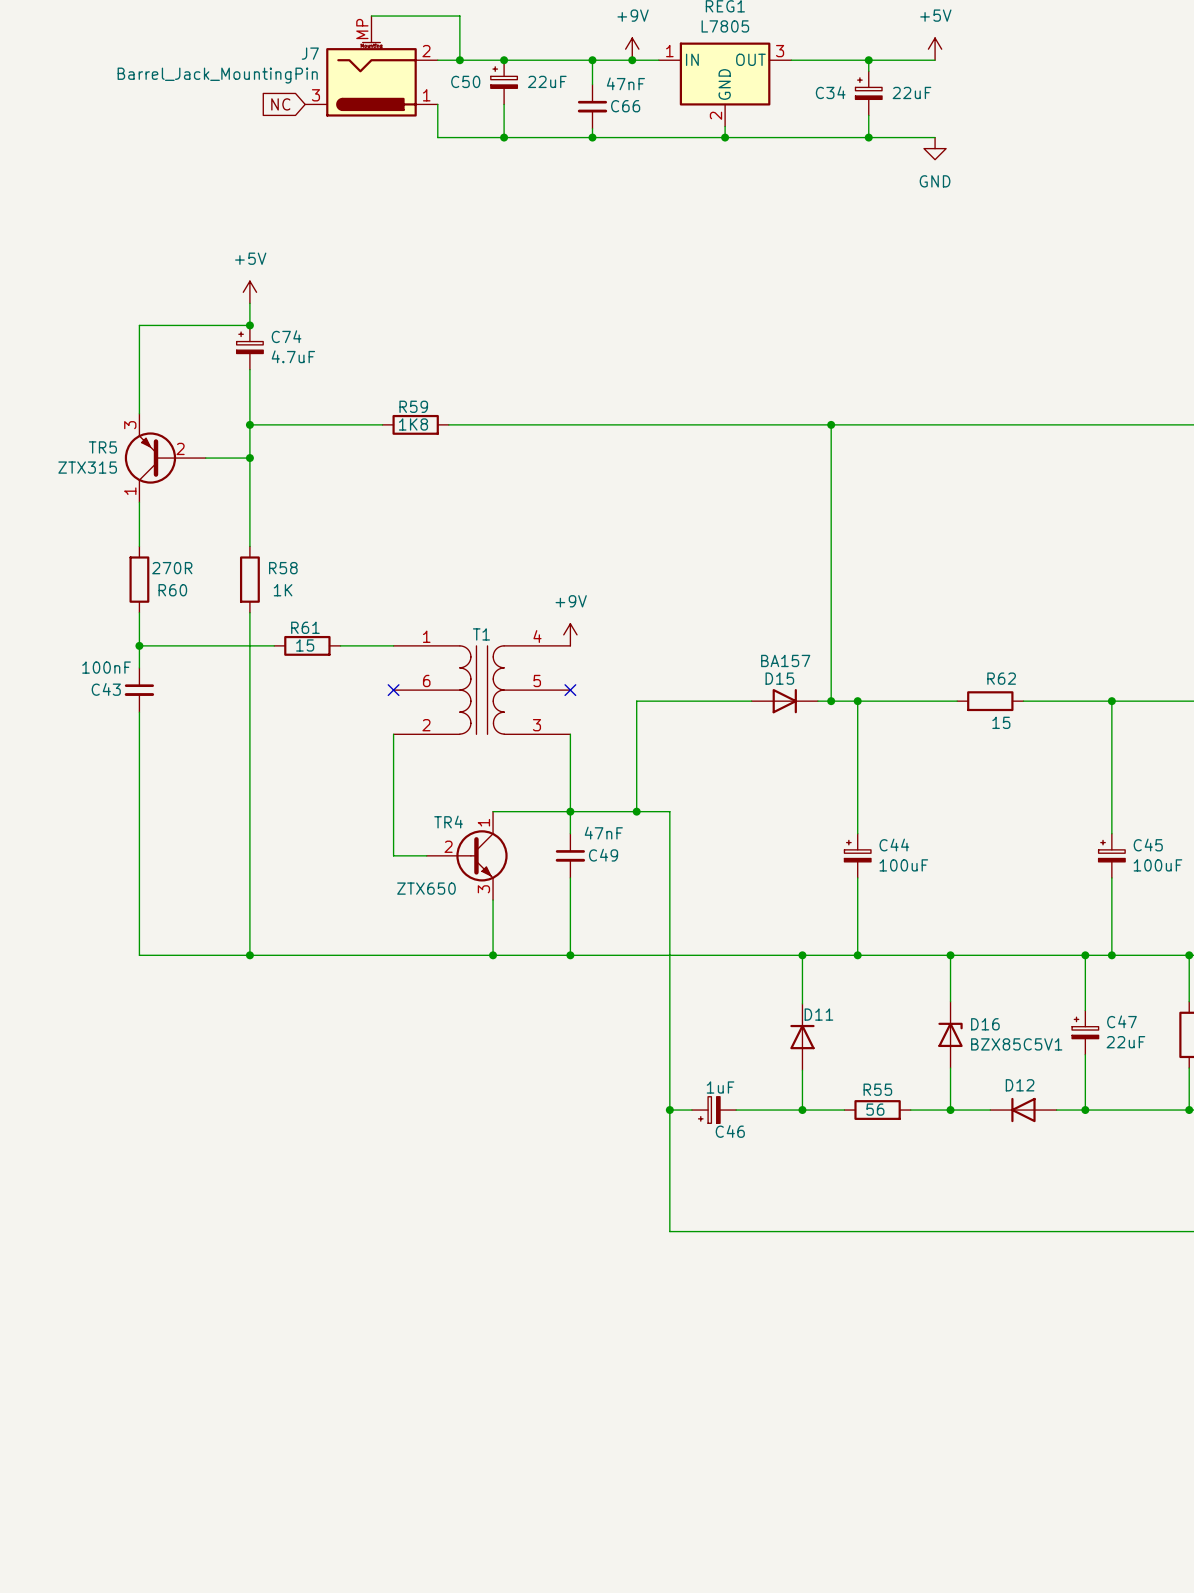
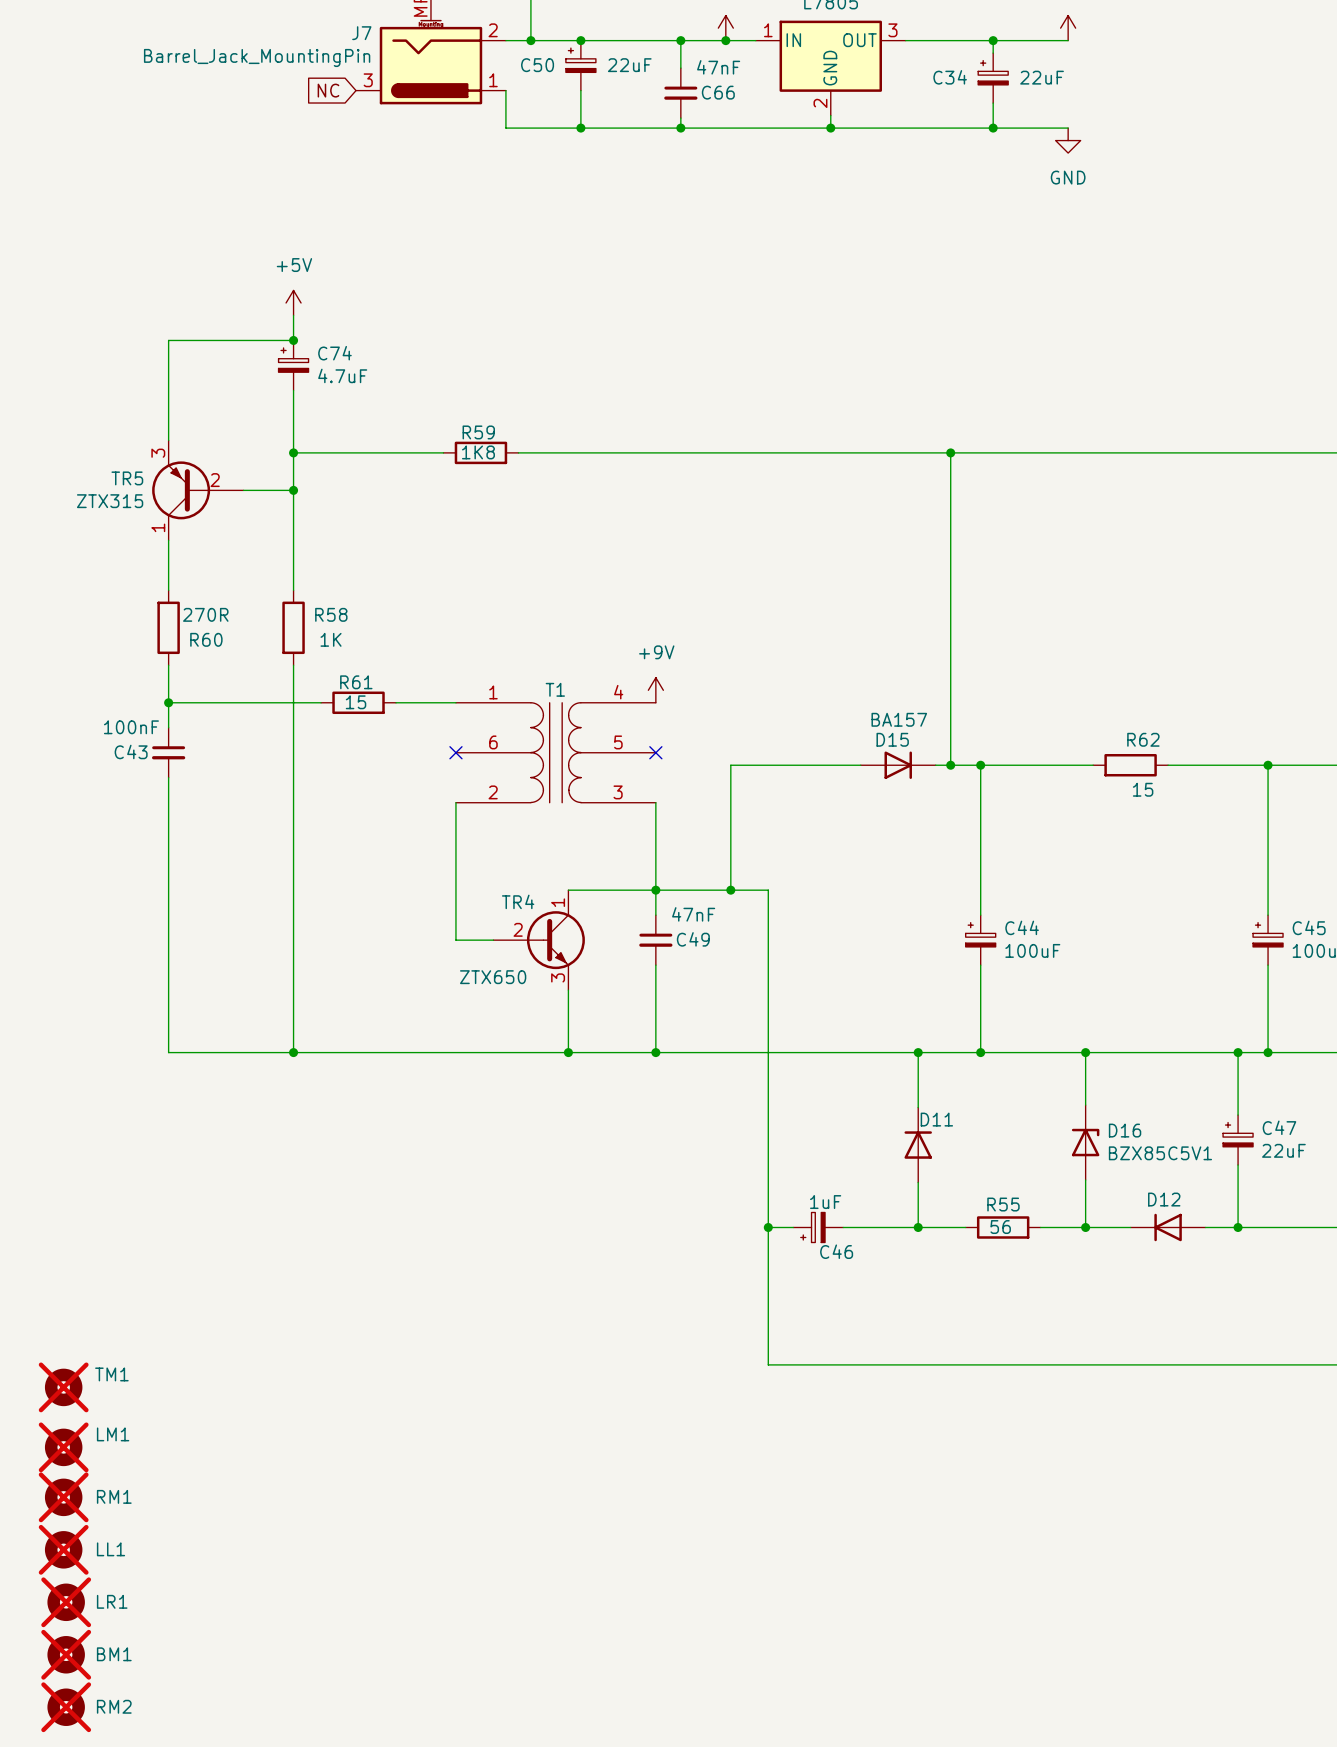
TM1: none -> (63, 1387)
LM1: none -> (63, 1447)
RM1: none -> (63, 1497)
LL1: none -> (63, 1549)
LR1: none -> (66, 1602)
BM1: none -> (66, 1654)
RM2: none -> (66, 1707)

